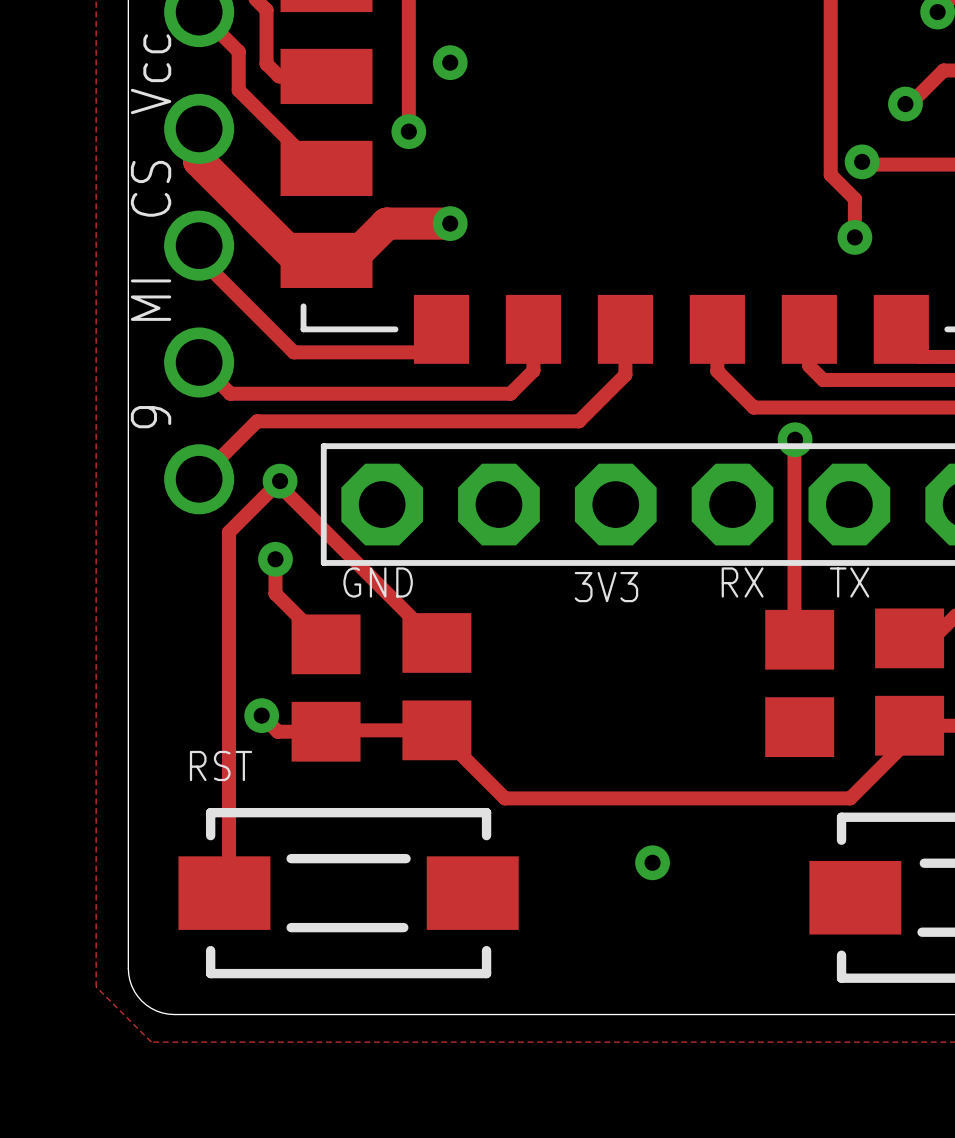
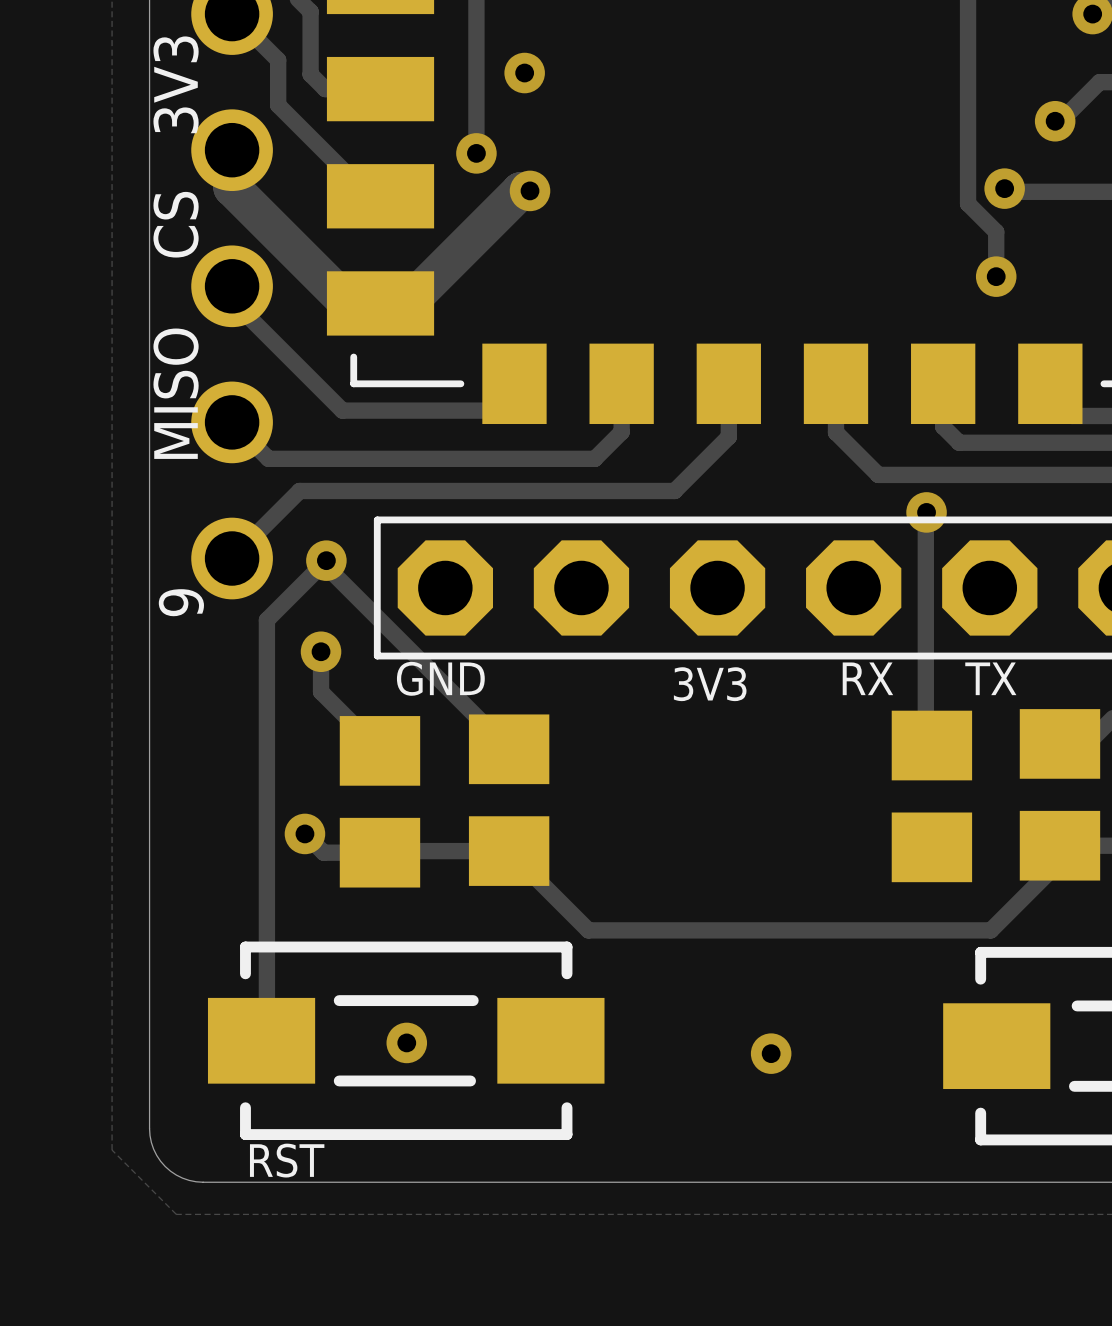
text: Vcc (151, 74) -> 3V3 (176, 84)
track: (386, 223) (450, 223) -> (450, 260) (520, 190) (530, 190)
via position: (450, 223) -> (530, 190)
text: MI (151, 300) -> MISO (176, 393)
text position: 9 (151, 417) -> 9 (181, 602)
text position: RST (221, 765) -> RST (287, 1160)
via position: (652, 862) -> (771, 1053)
via: none -> (406, 1042)

